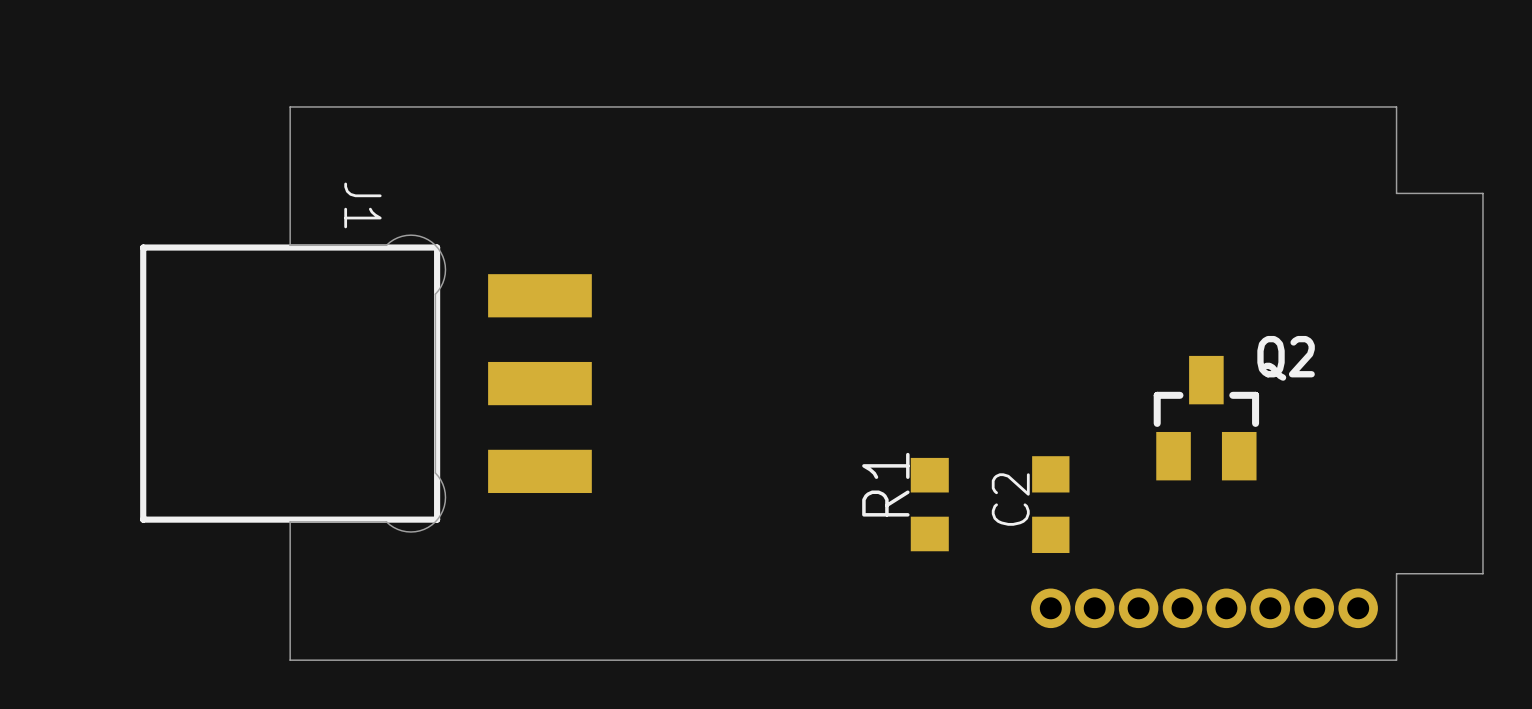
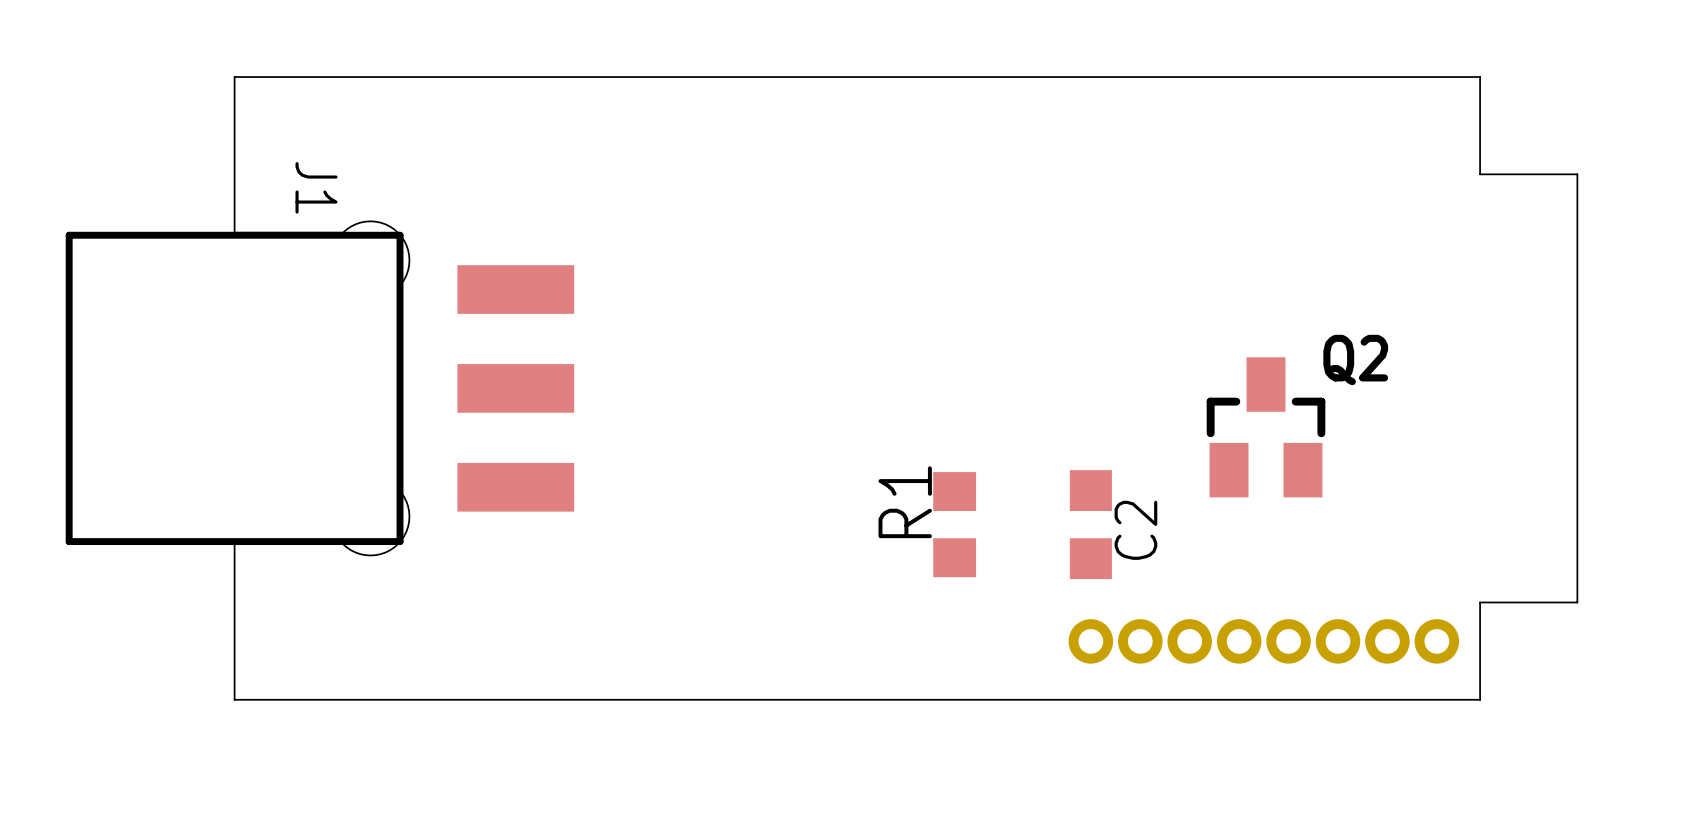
C2 name position: C2 (1010, 499) -> C2 (1135, 530)

